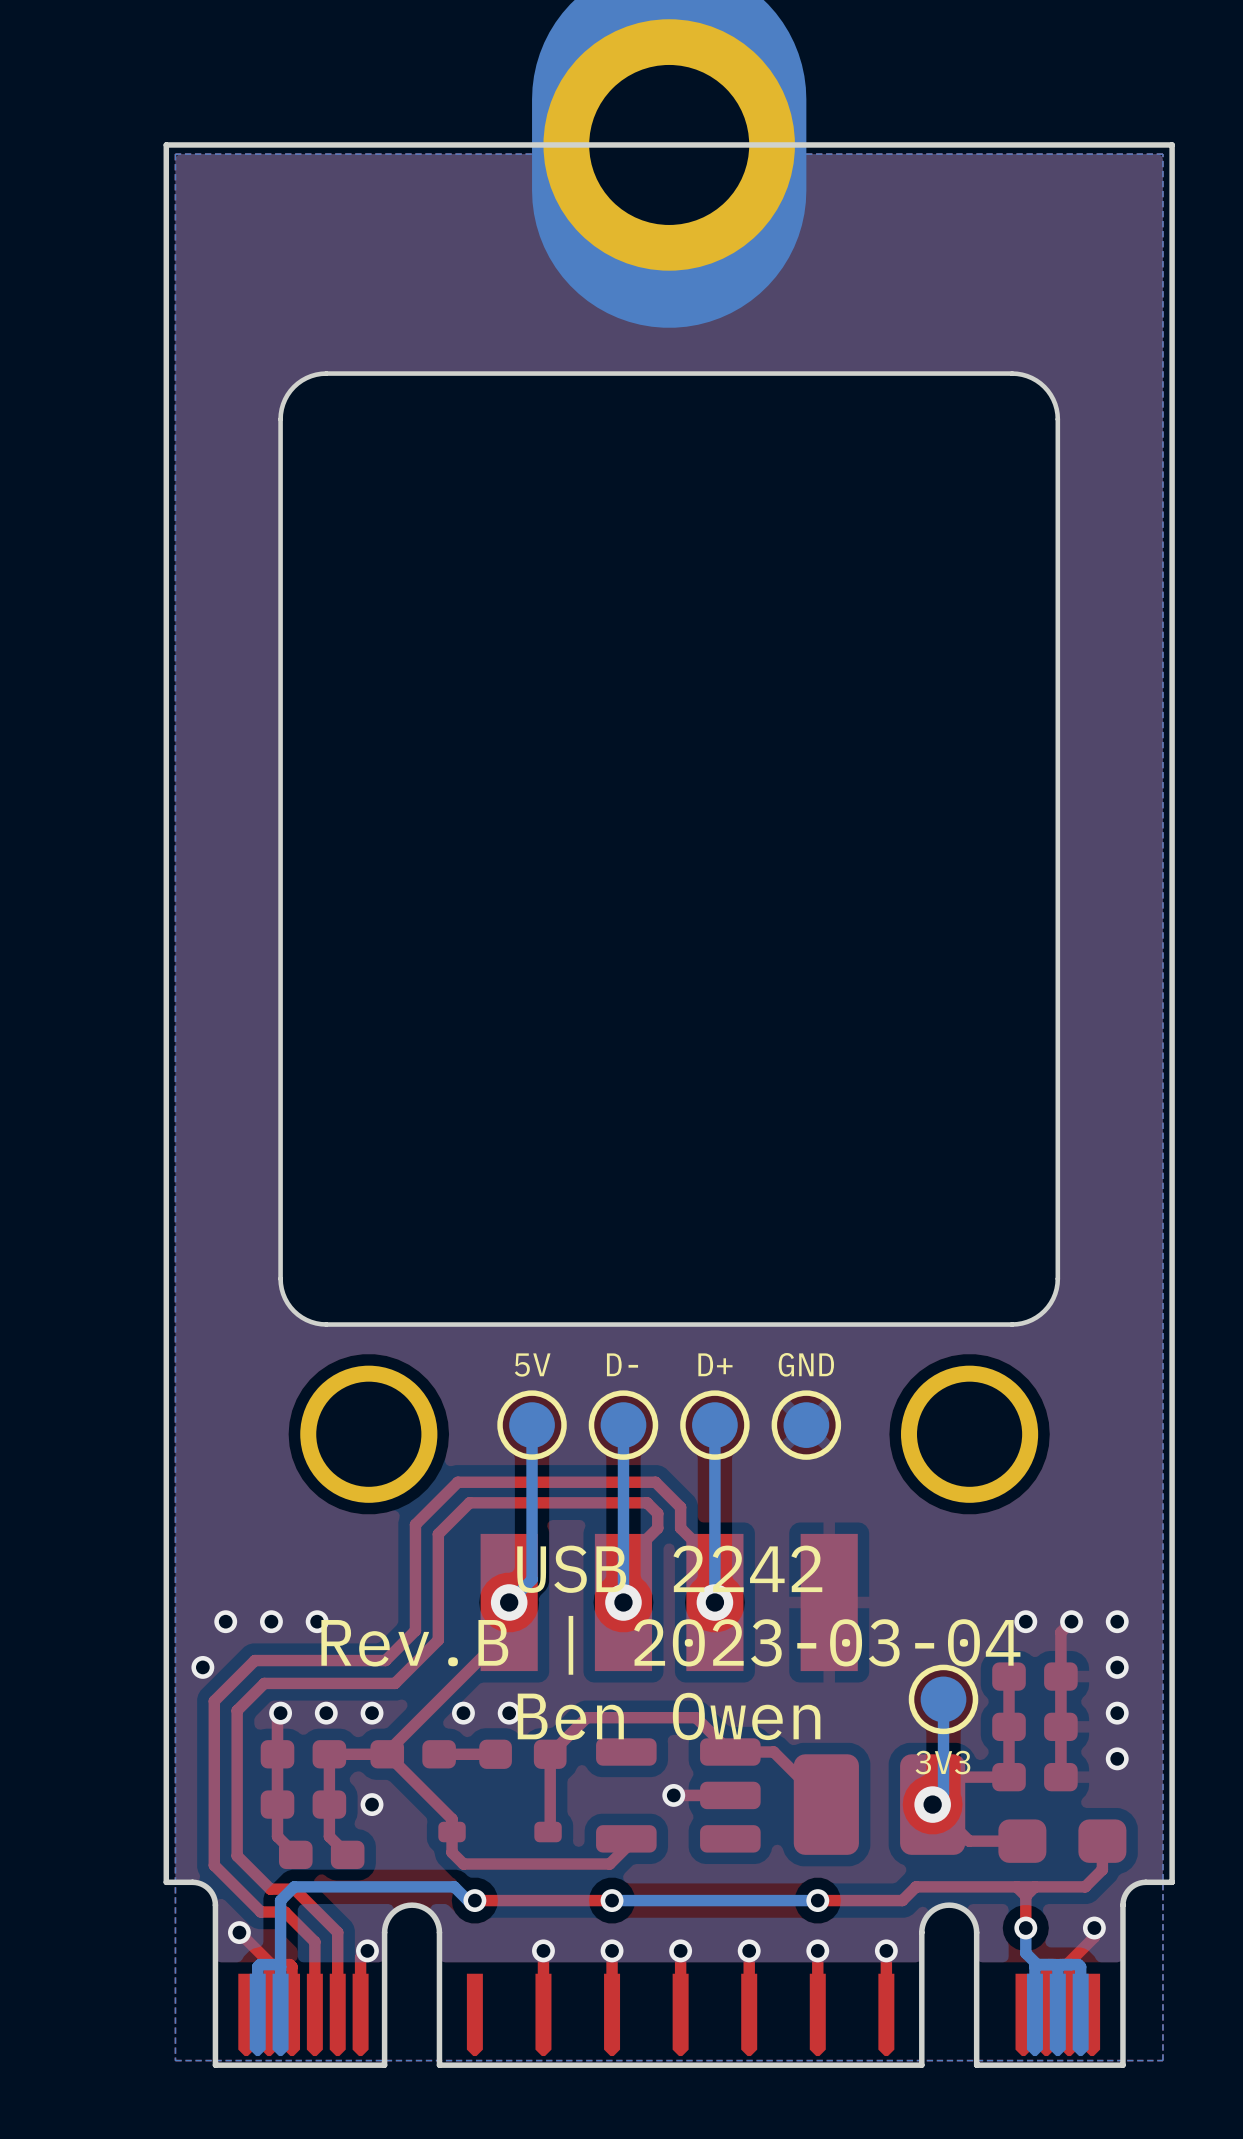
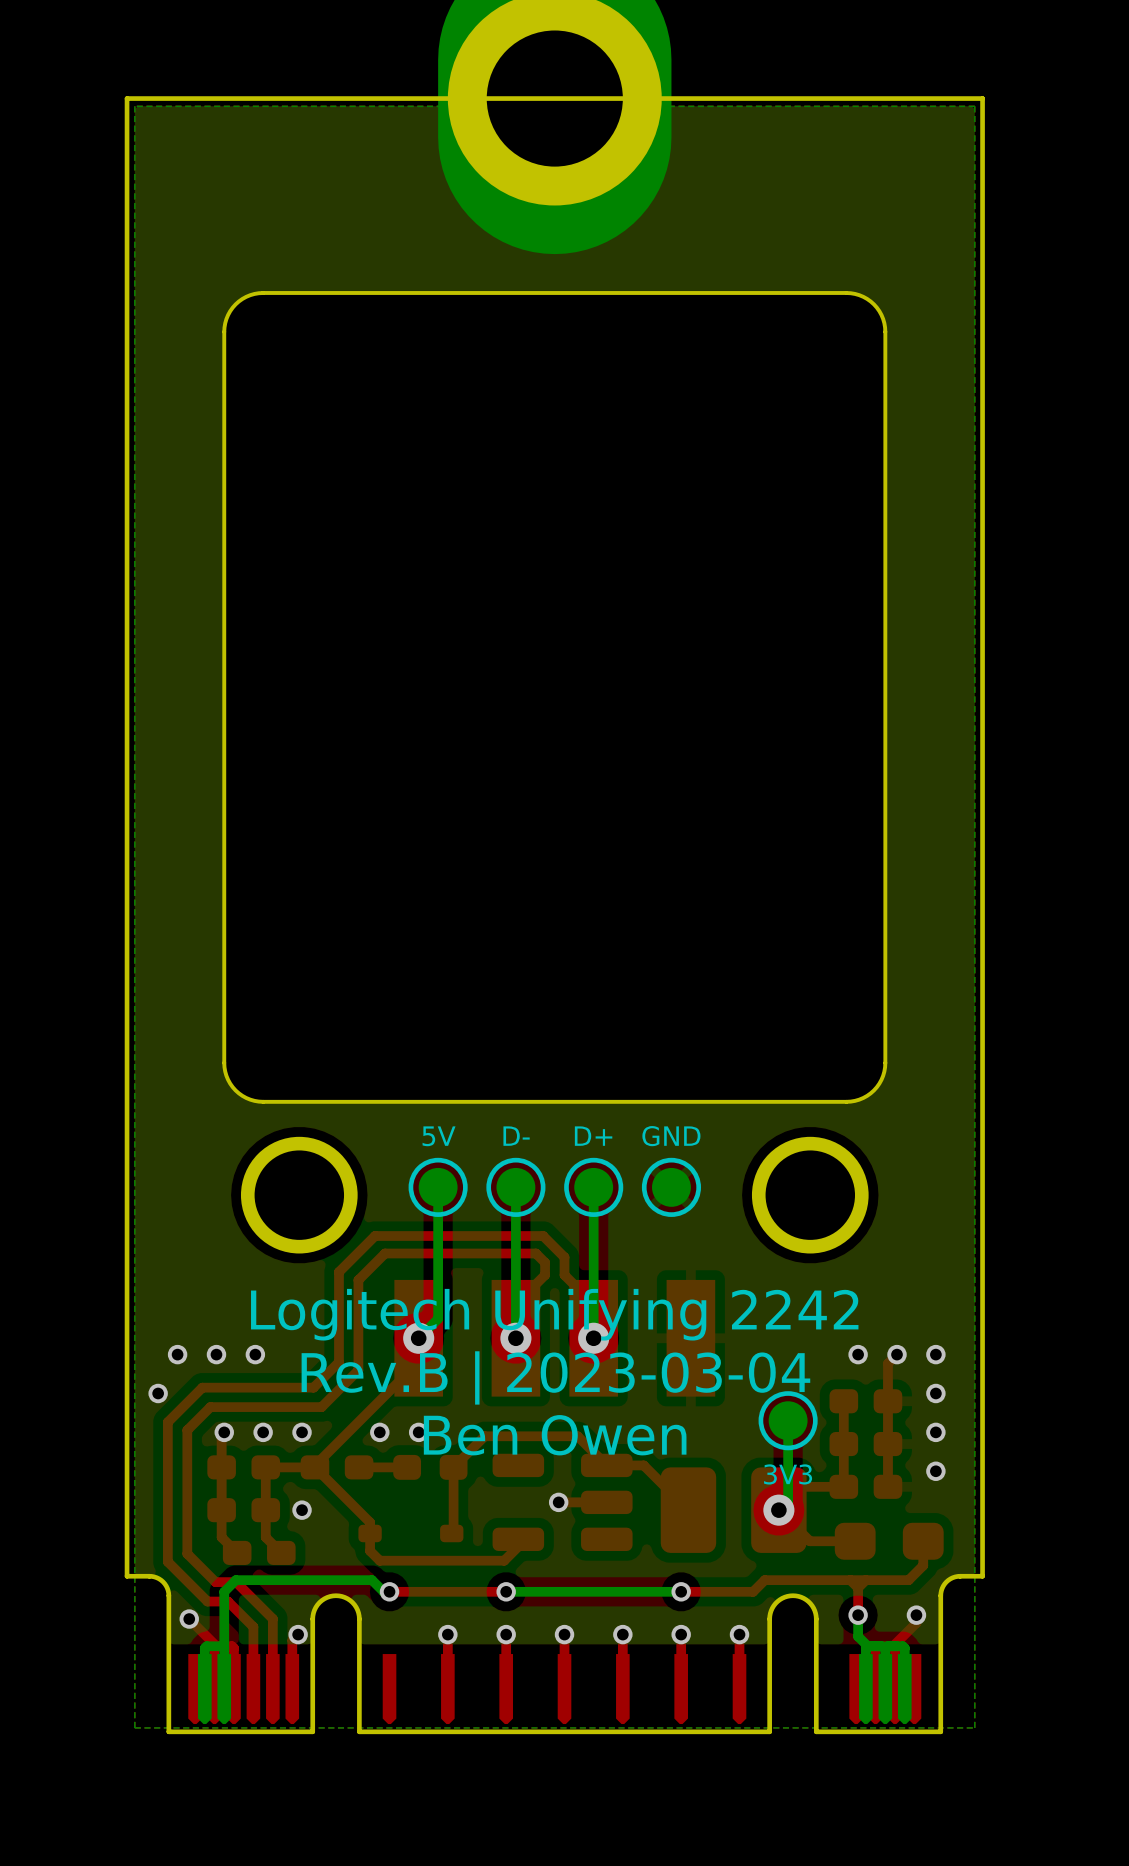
text: USB 2242 (669, 1569) -> Logitech Unifying 2242 (554, 1314)

